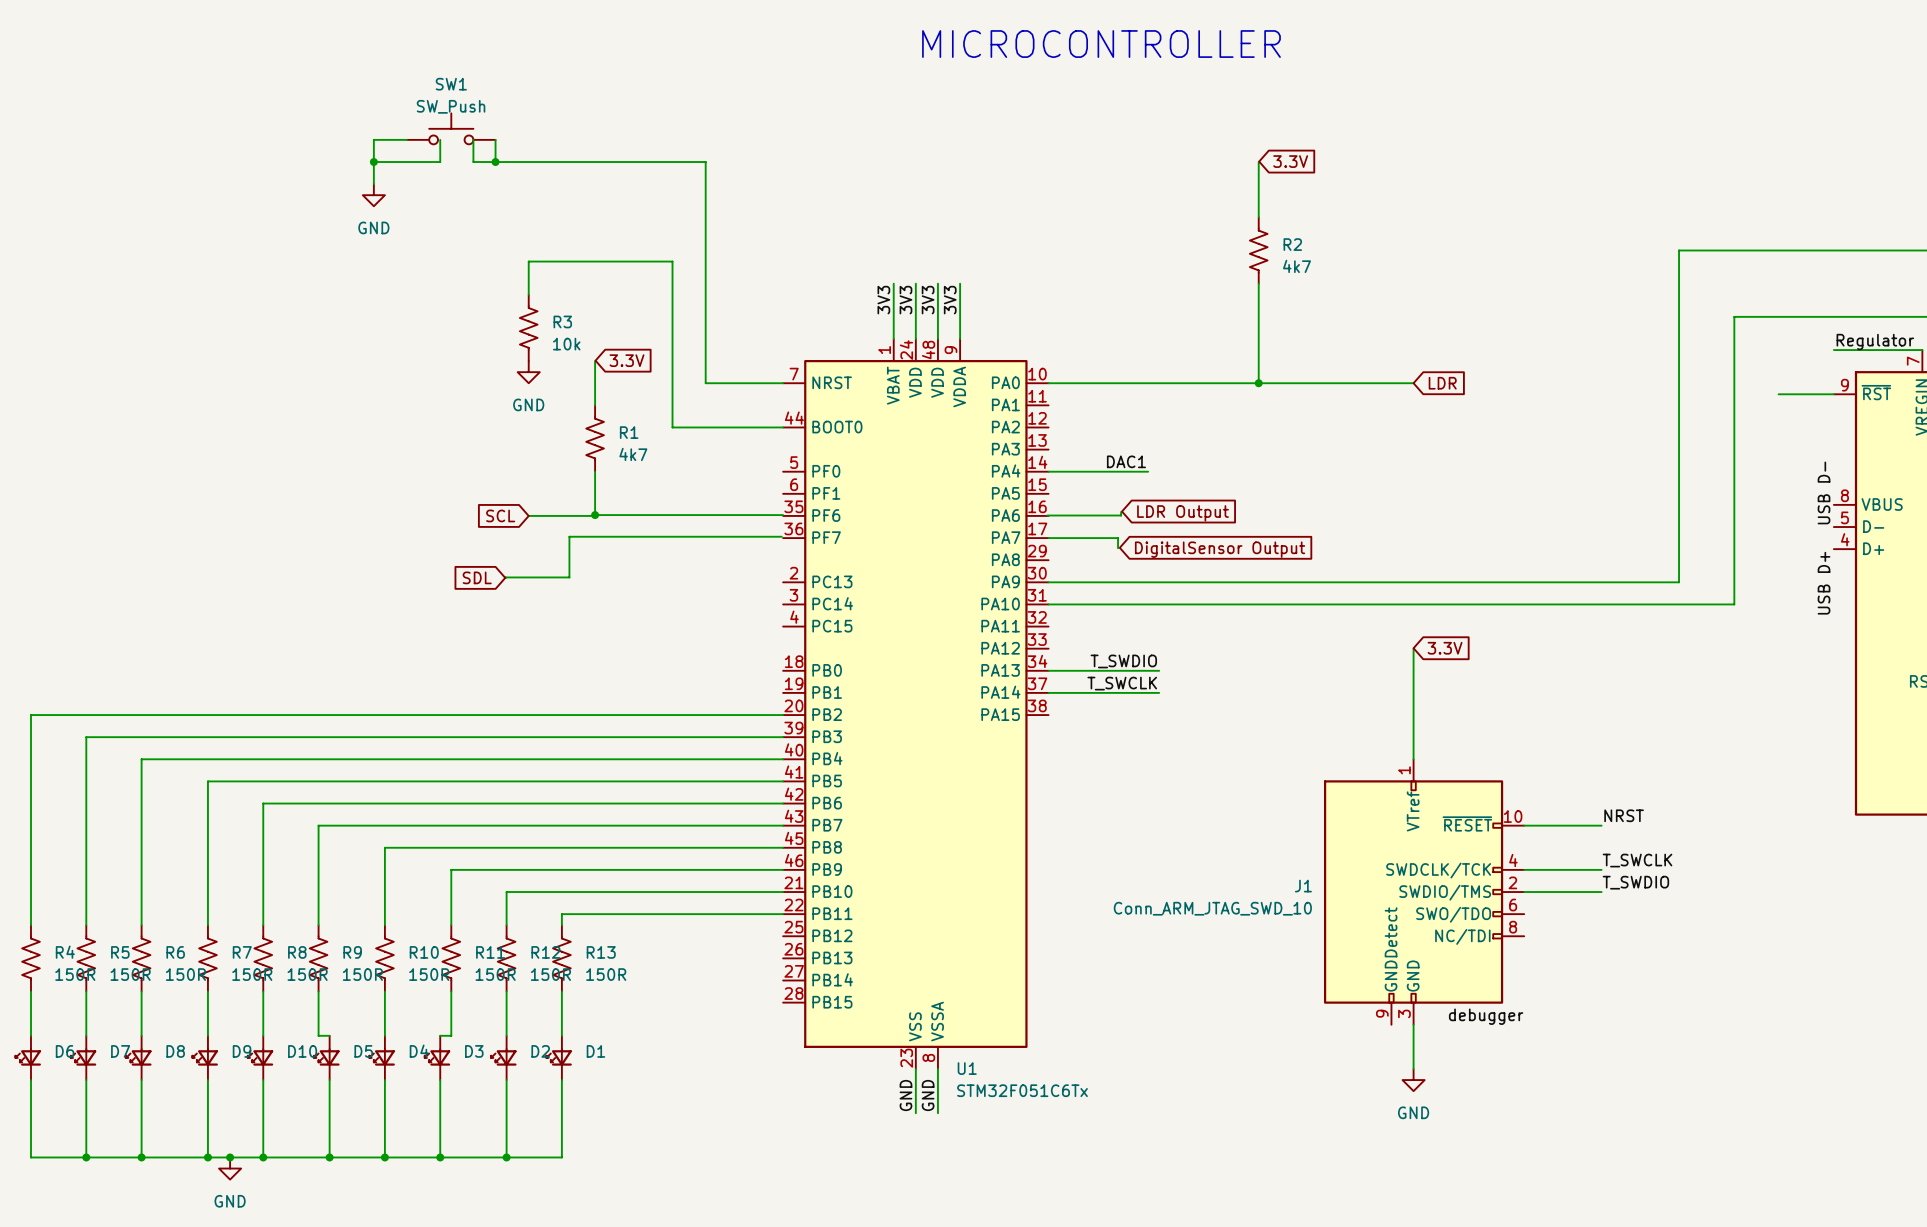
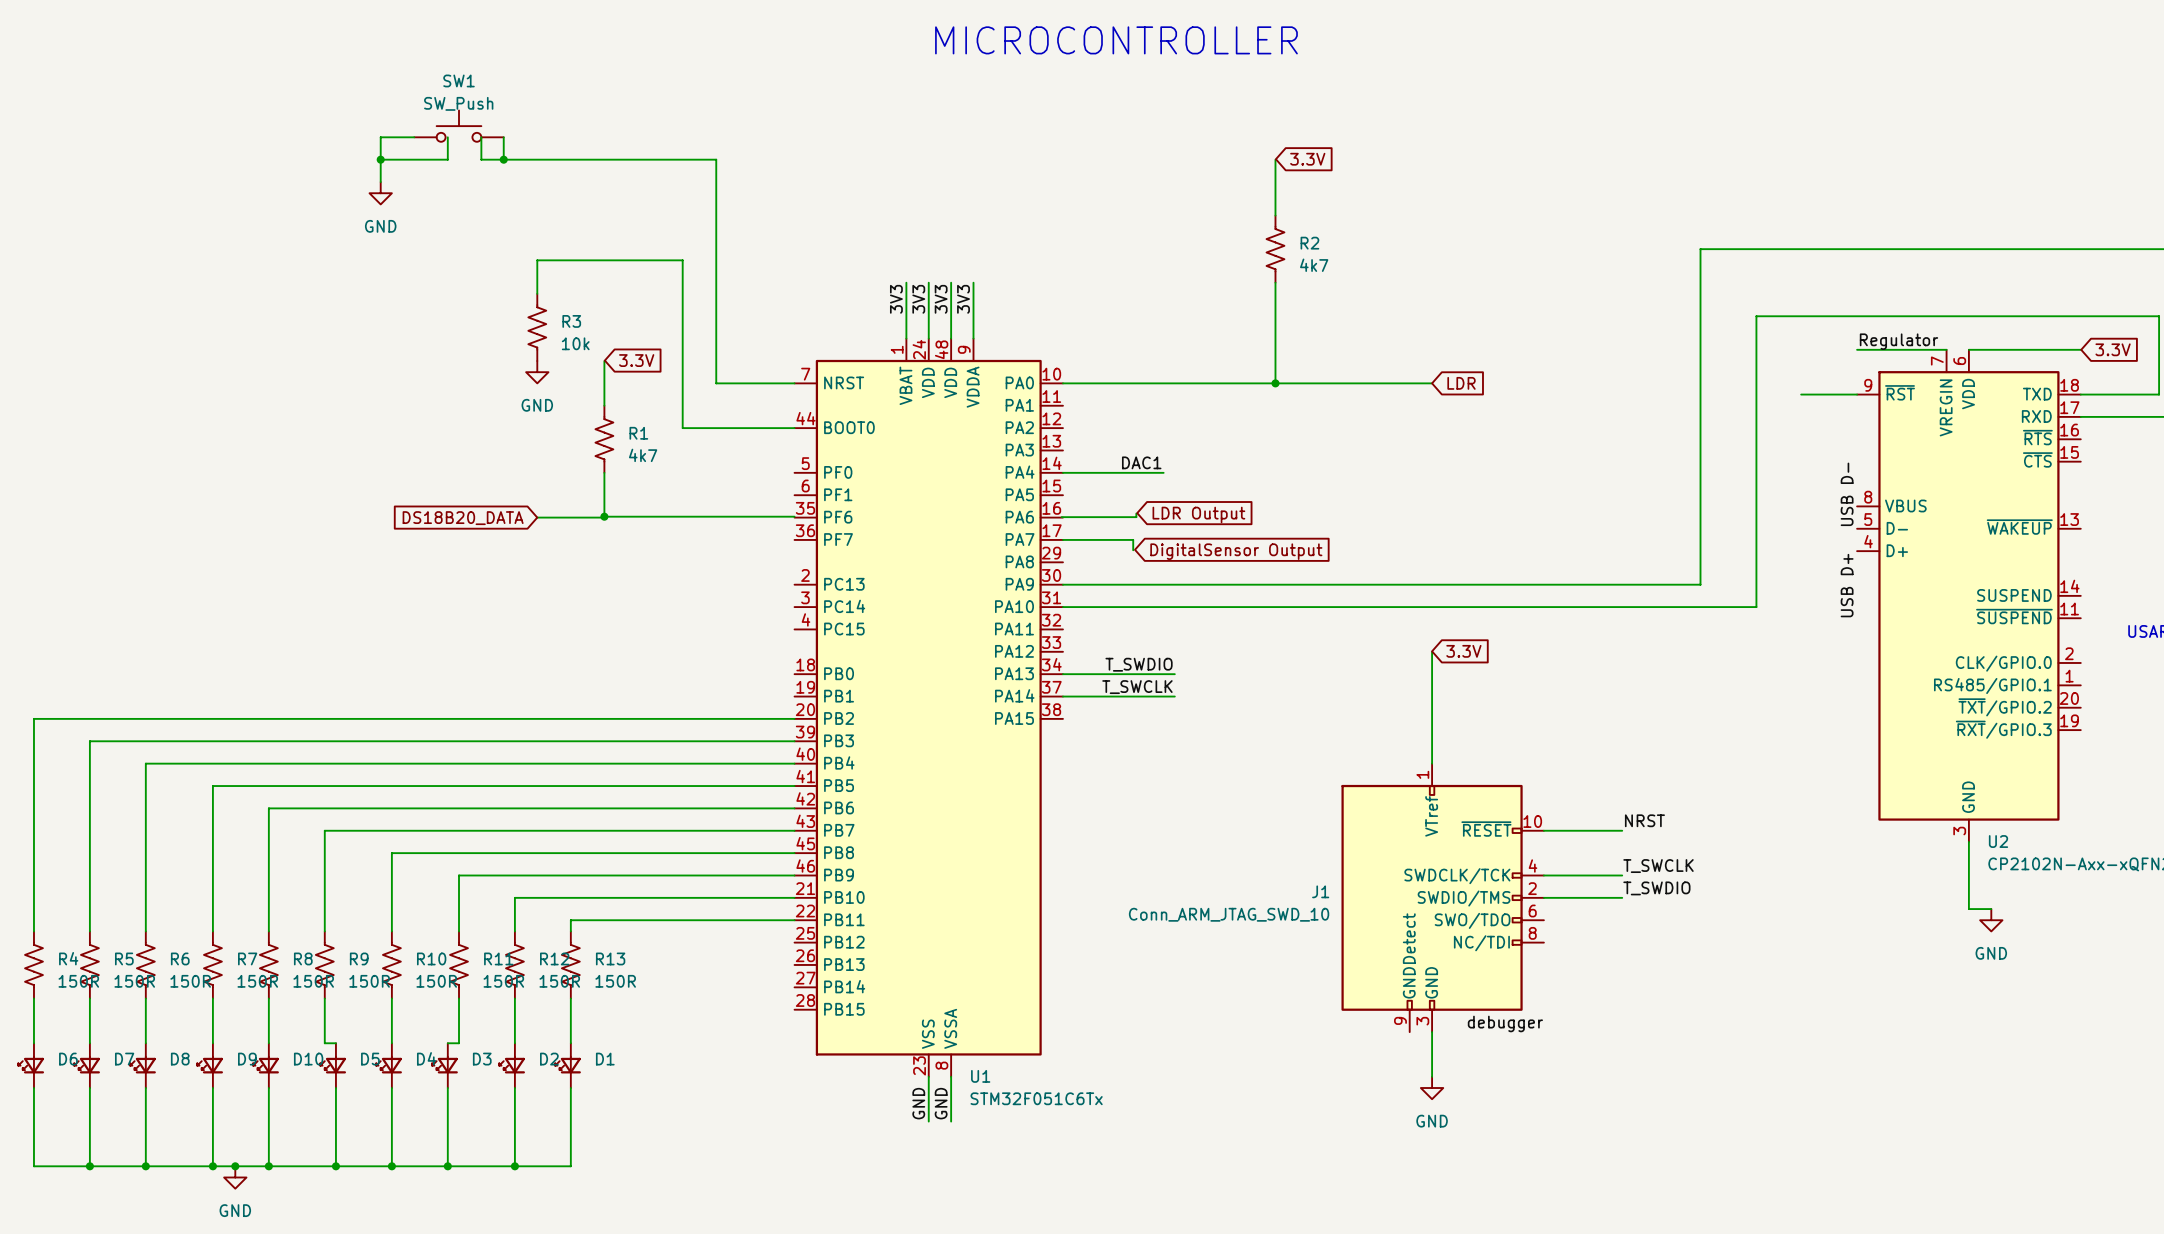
global label: SCL (500, 515) -> DS18B20_DATA (463, 518)
wire: (781, 536) (569, 536) (569, 577) (505, 577) -> none
global label: SDL (477, 577) -> none

